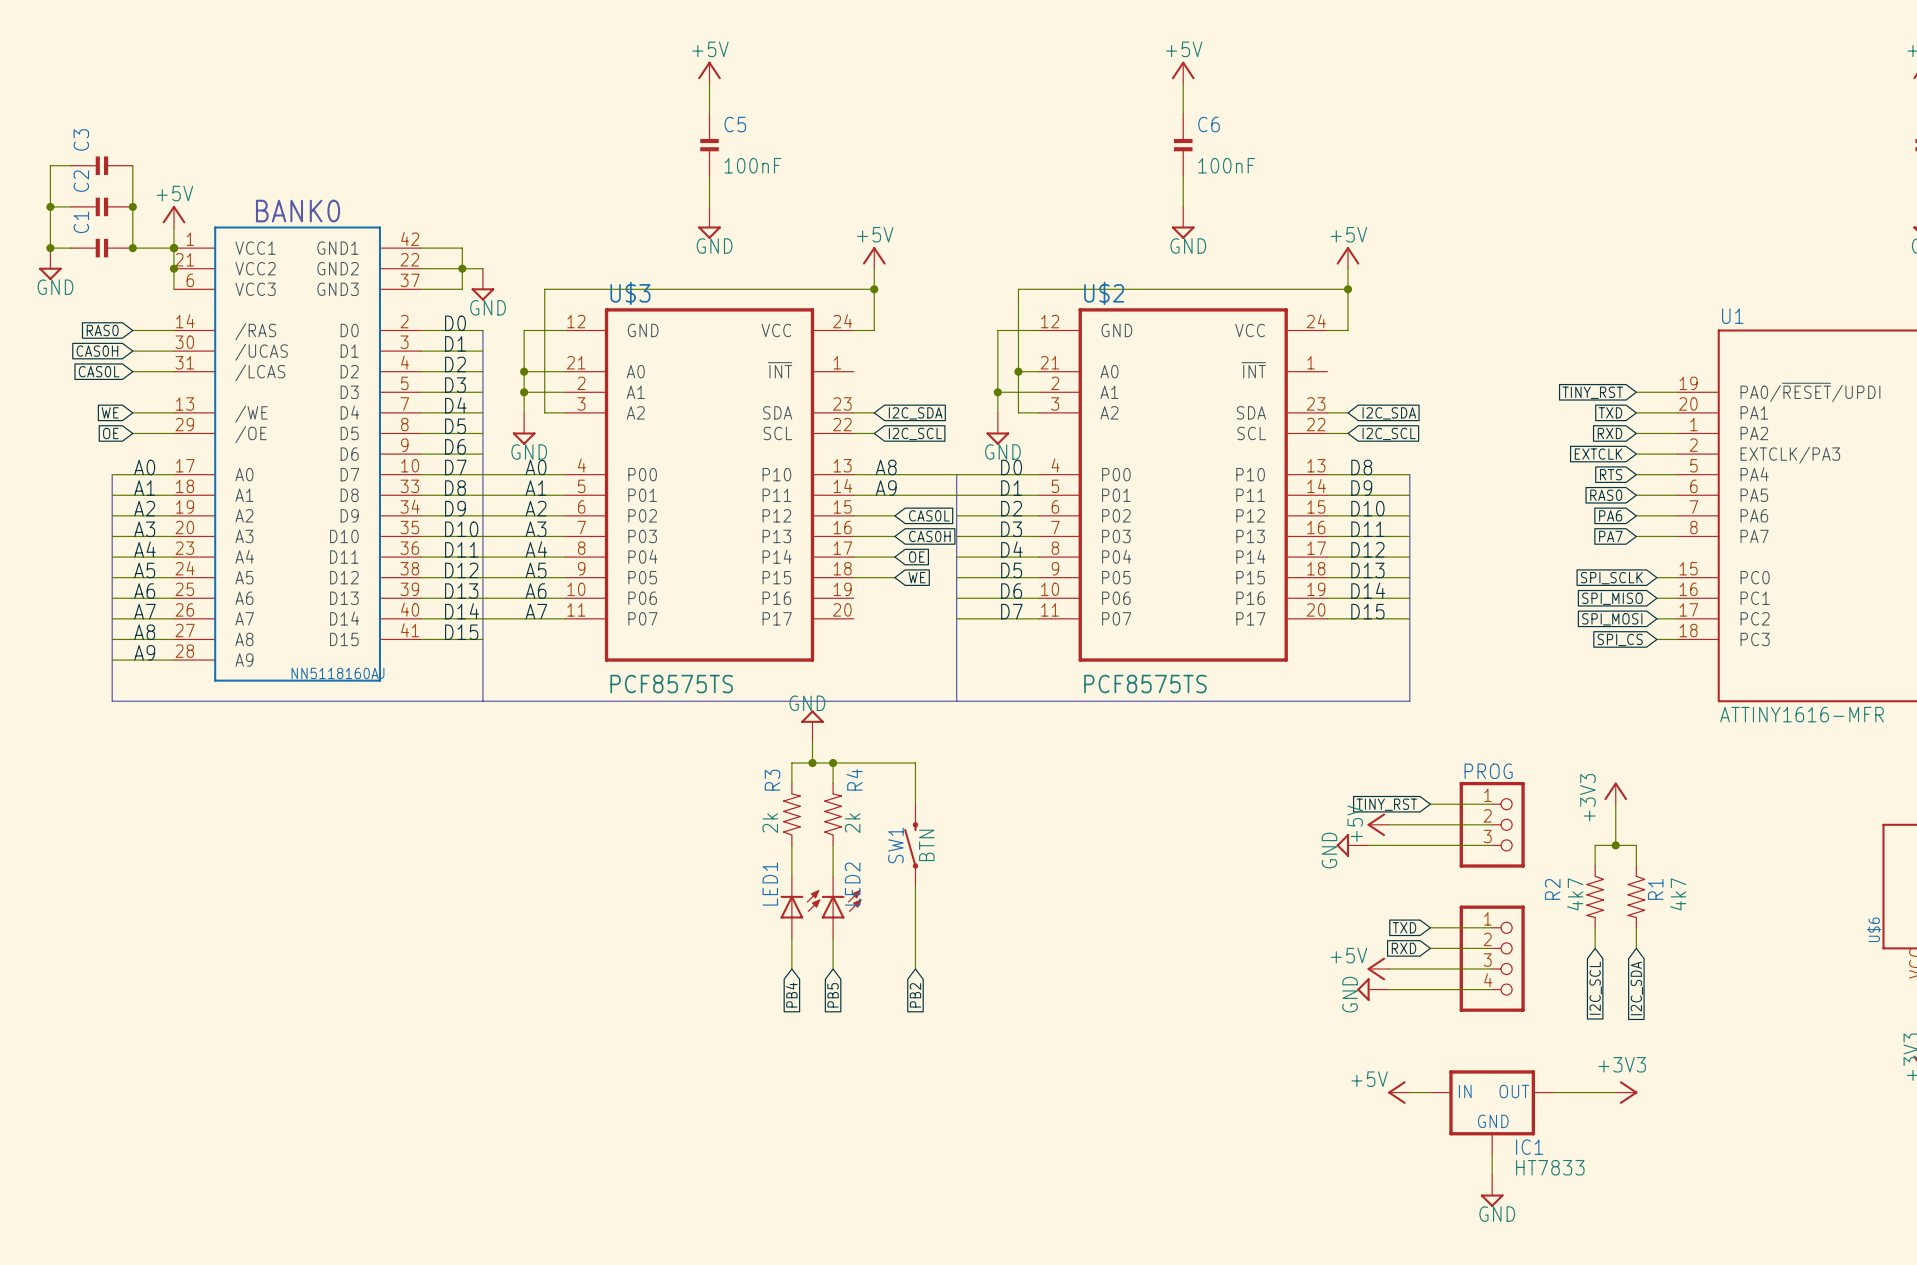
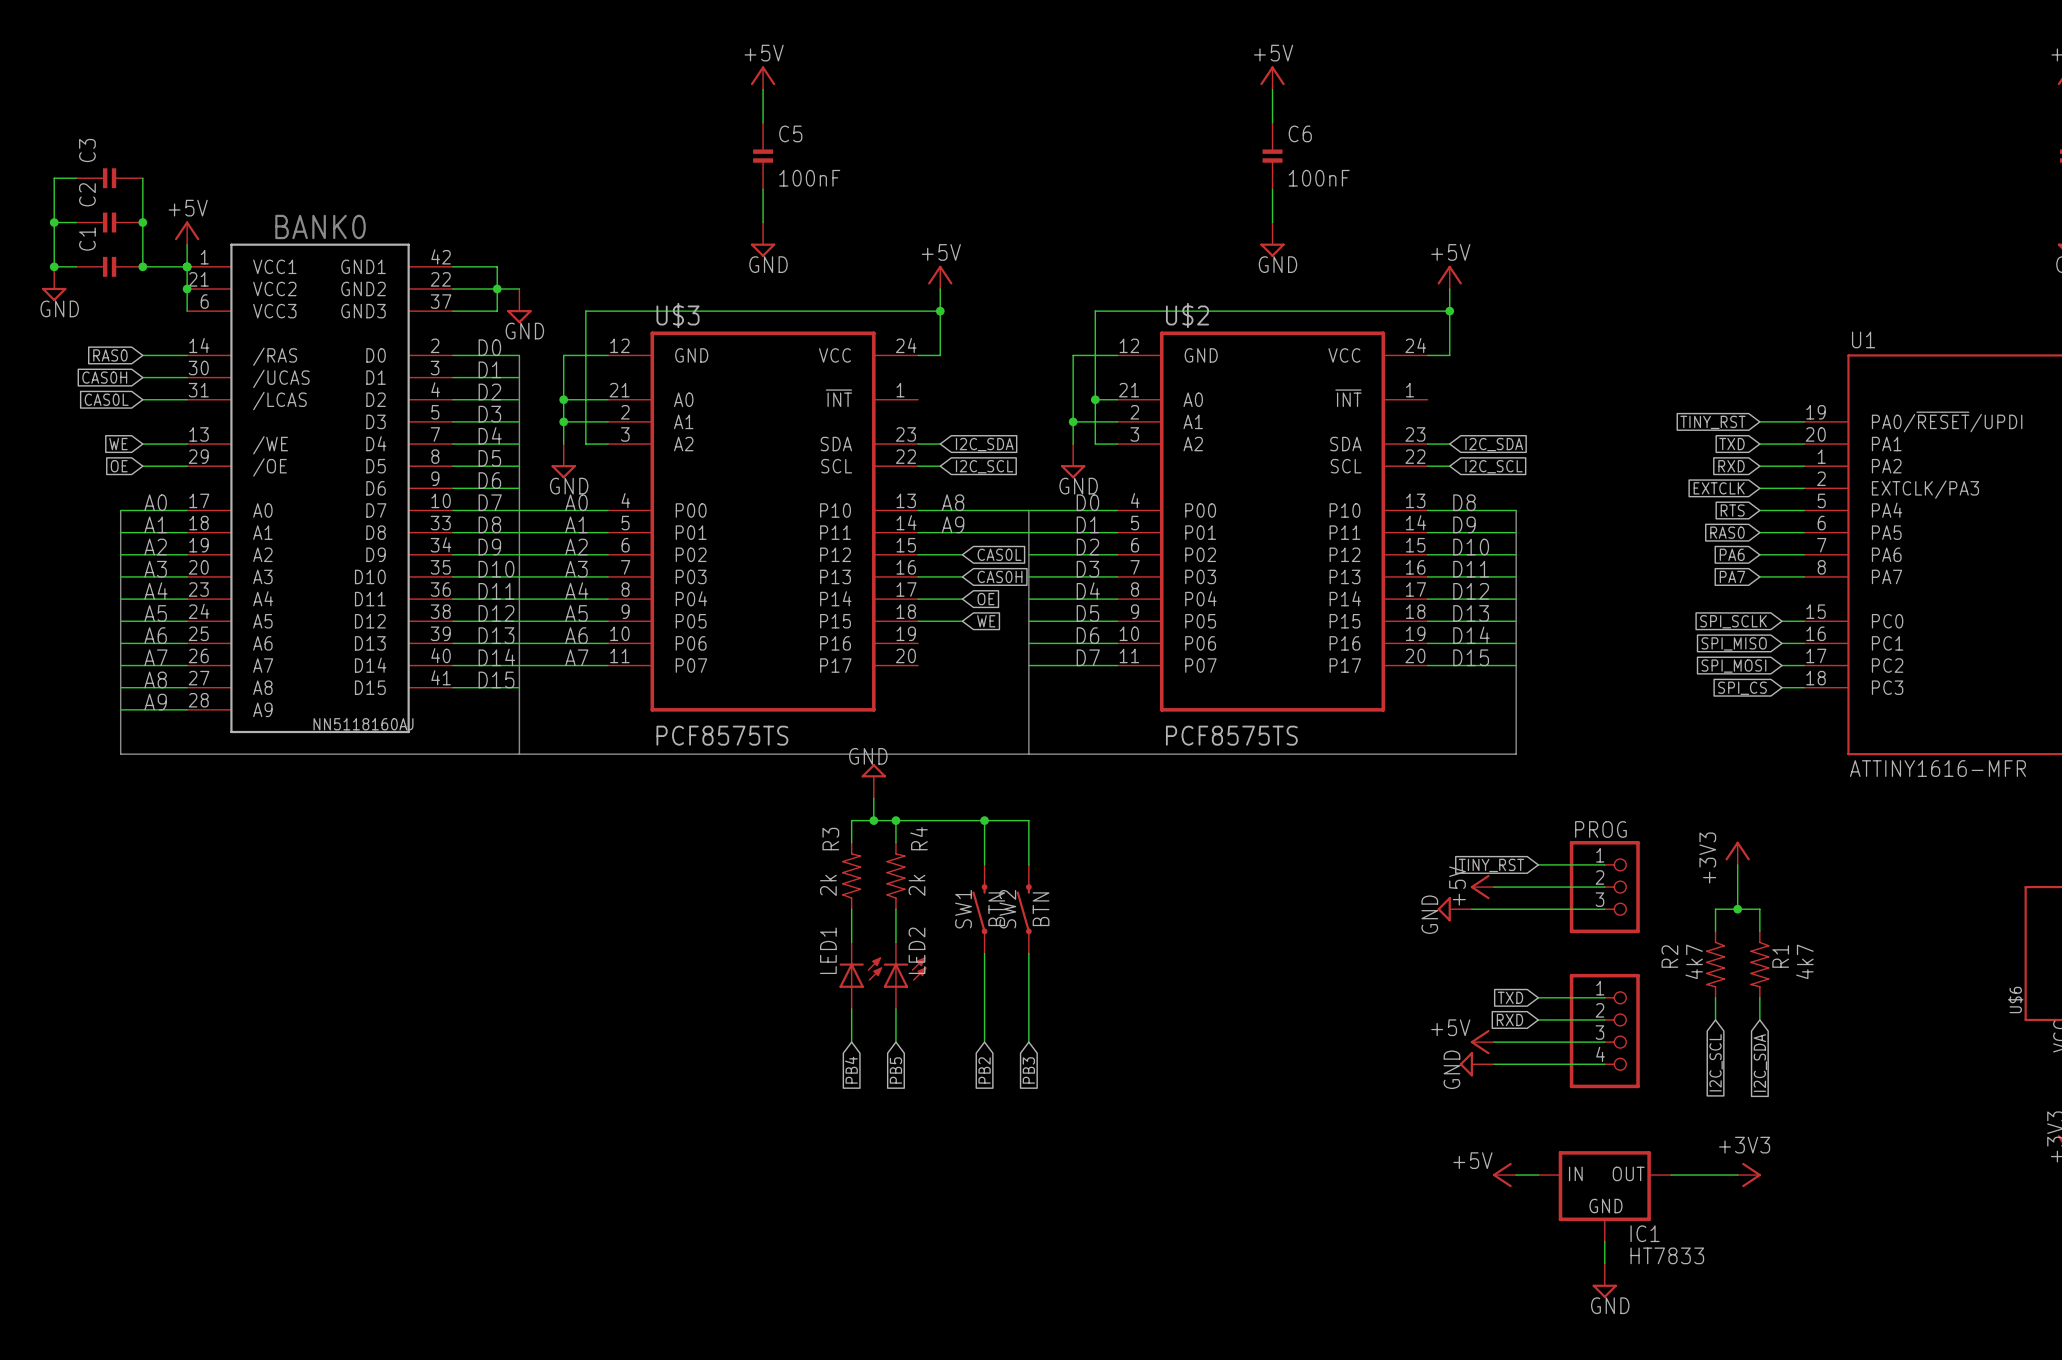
wire: none -> (984, 820) (1028, 820) (1028, 864)
junction: none -> (984, 820)
SW2: none -> BTN (1024, 909)
wire: none -> (1028, 953) (1028, 1042)
global label: none -> PB3 (1028, 1070)

